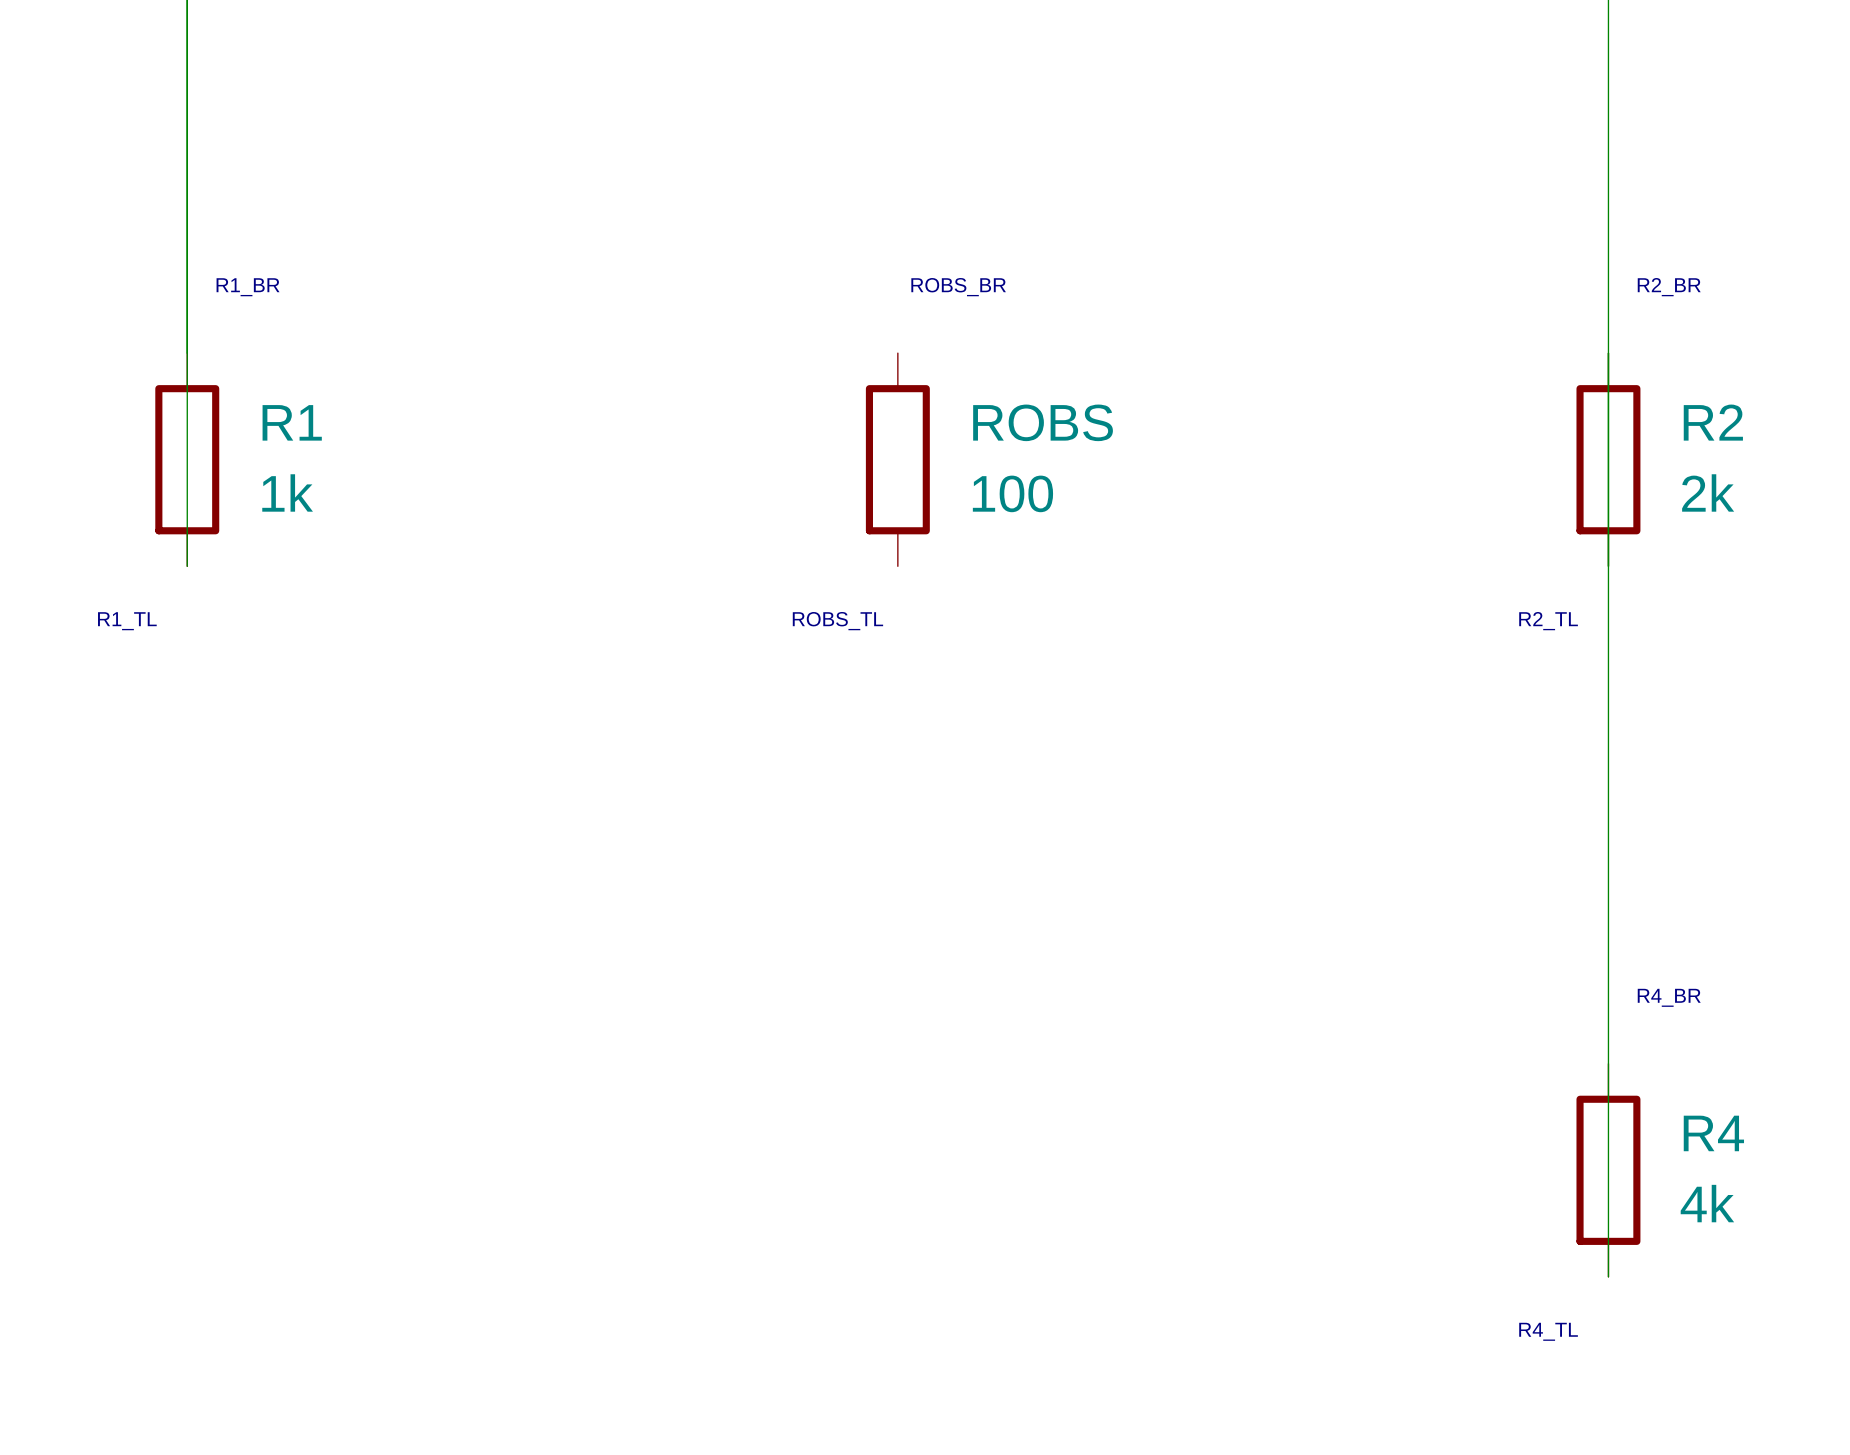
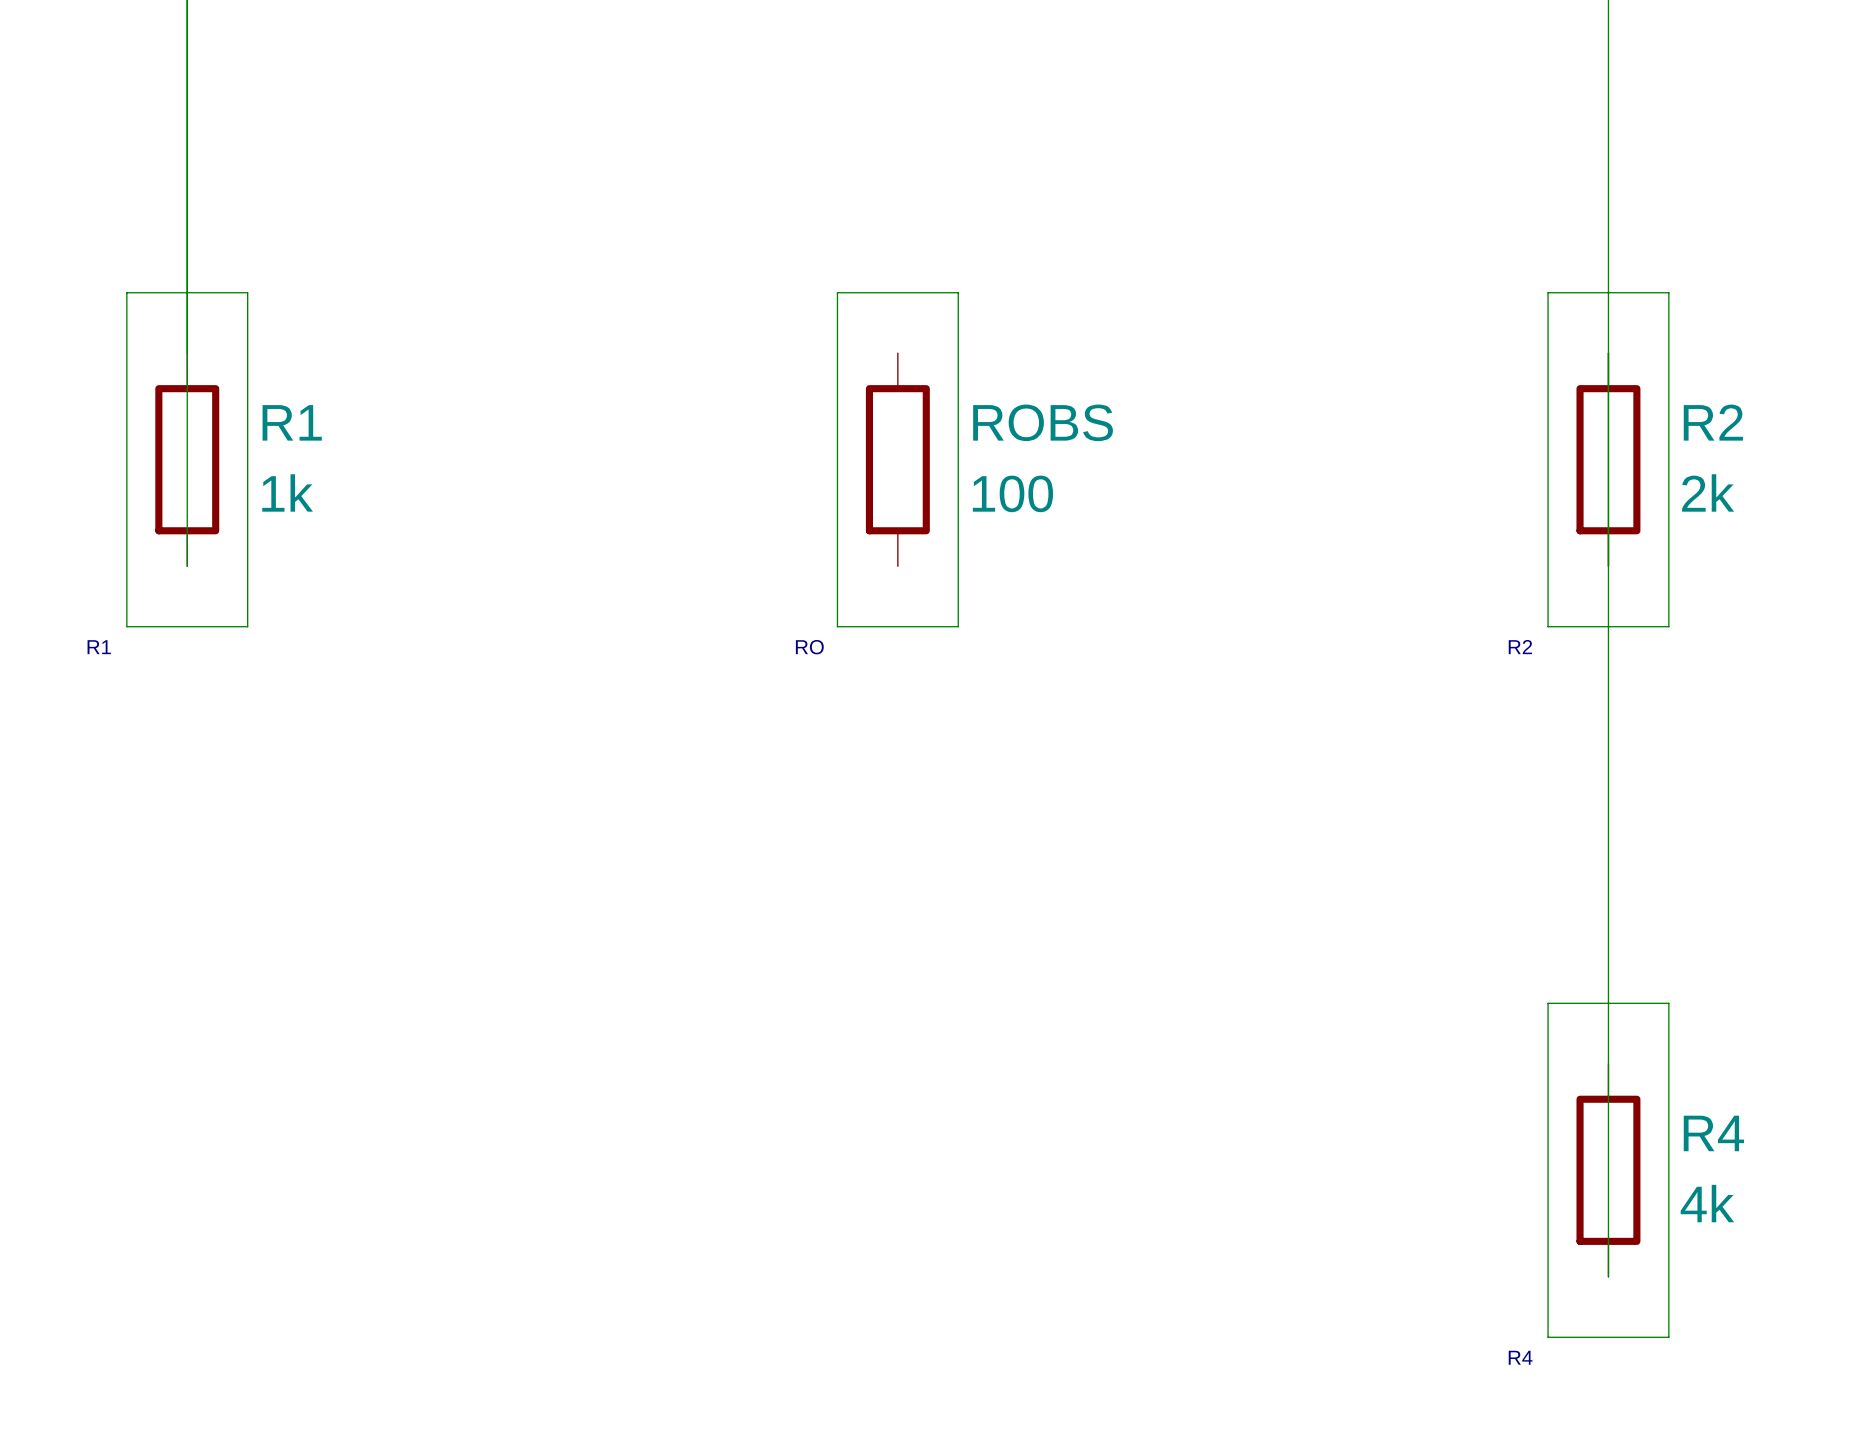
text: R1_BR (248, 287) -> none
text: ROBS_BR (958, 287) -> none
text: R2_BR (1669, 287) -> none
wire: none -> (126, 292) (247, 292) (247, 626) (126, 626) (126, 292)
wire: none -> (837, 292) (958, 292) (958, 626) (837, 626) (837, 292)
wire: none -> (1548, 292) (1668, 292) (1668, 626) (1548, 626) (1548, 292)
text: R1_TL (127, 621) -> none
text: ROBS_TL (837, 621) -> none
text: R2_TL (1548, 621) -> none
text: none -> R1 (99, 647)
text: none -> RO (809, 647)
text: none -> R2 (1520, 647)
text: R4_BR (1669, 997) -> none
wire: none -> (1548, 1003) (1548, 1337) (1668, 1337) (1668, 1003) (1548, 1003)
text: R4_TL (1548, 1331) -> none
text: none -> R4 (1520, 1357)

